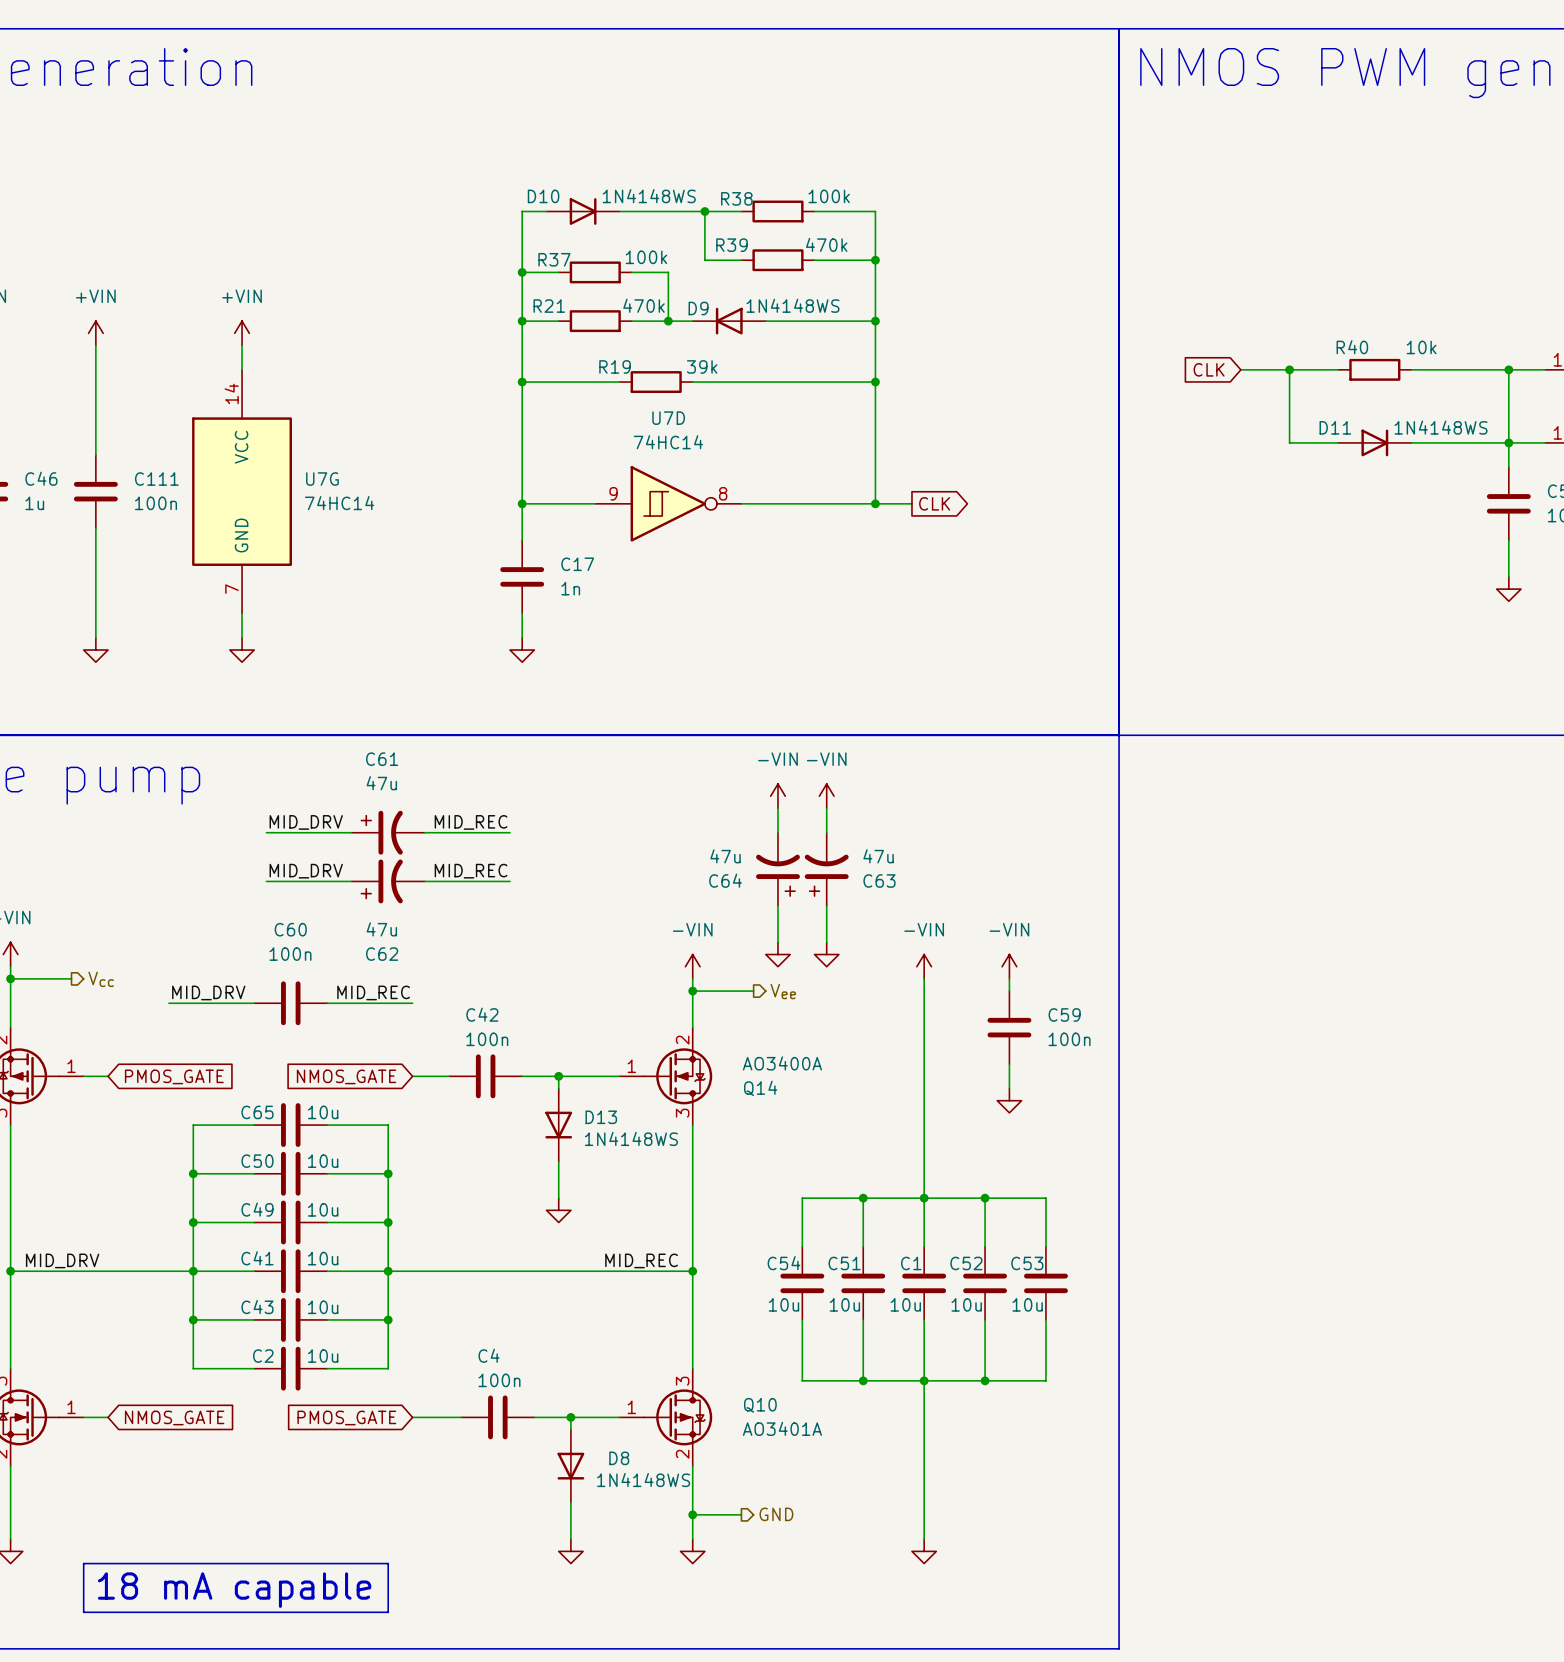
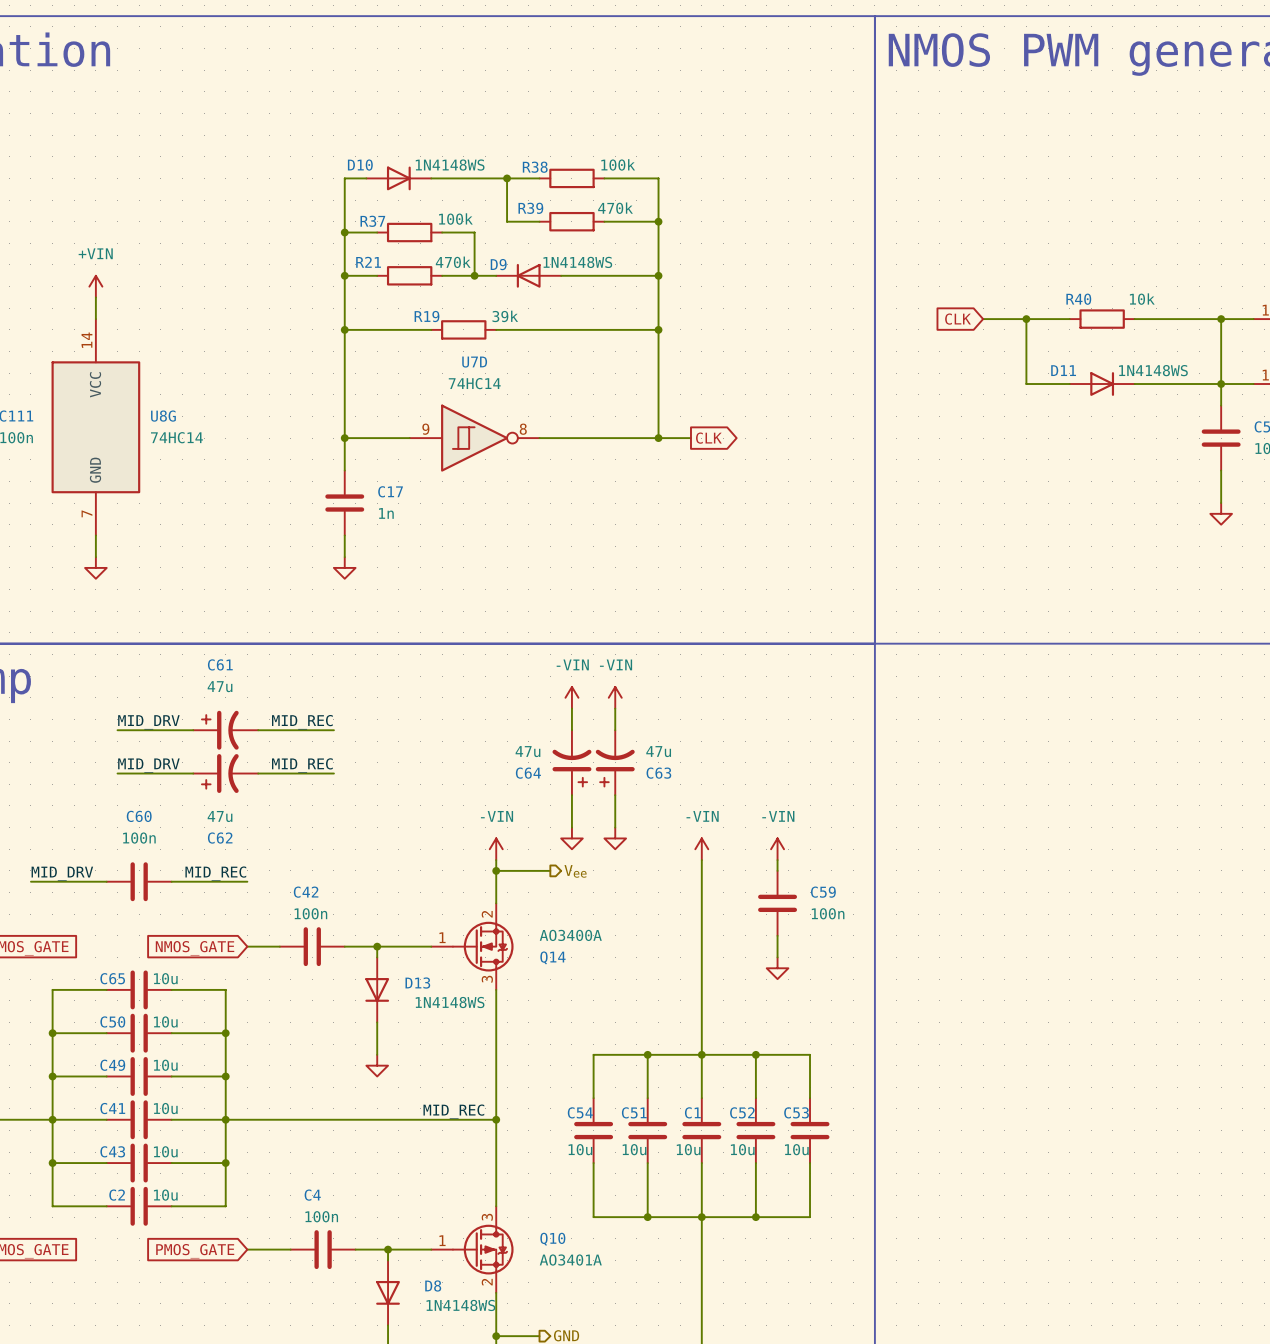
U7G name: U7G (322, 479) -> U8G (163, 416)

